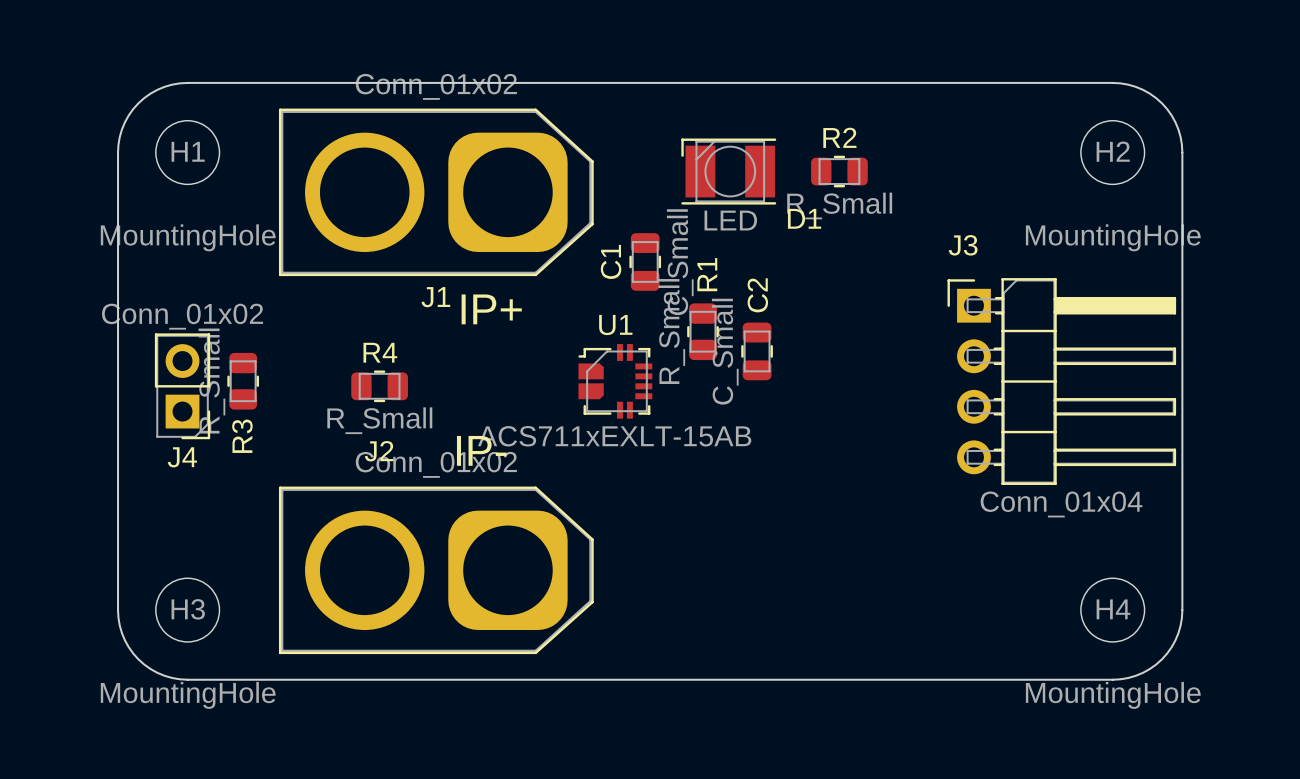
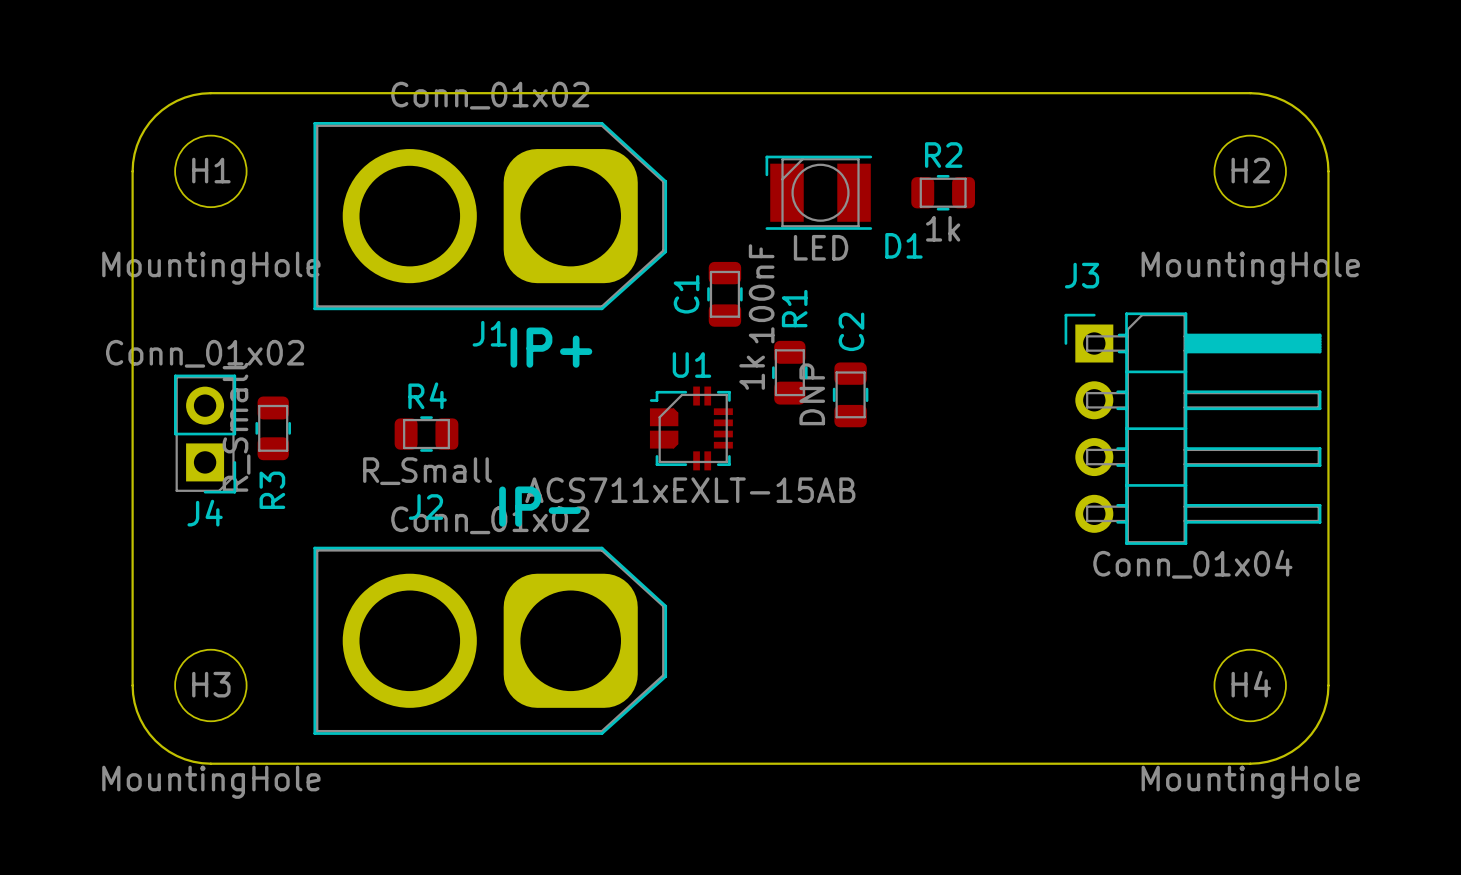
R2 value: R_Small (839, 205) -> 1k (943, 228)
C1 value: C_Small (680, 262) -> 100nF (761, 293)
R1 value: R_Small (671, 331) -> 1k (752, 372)
C2 value: C_Small (725, 351) -> DNP (812, 394)

